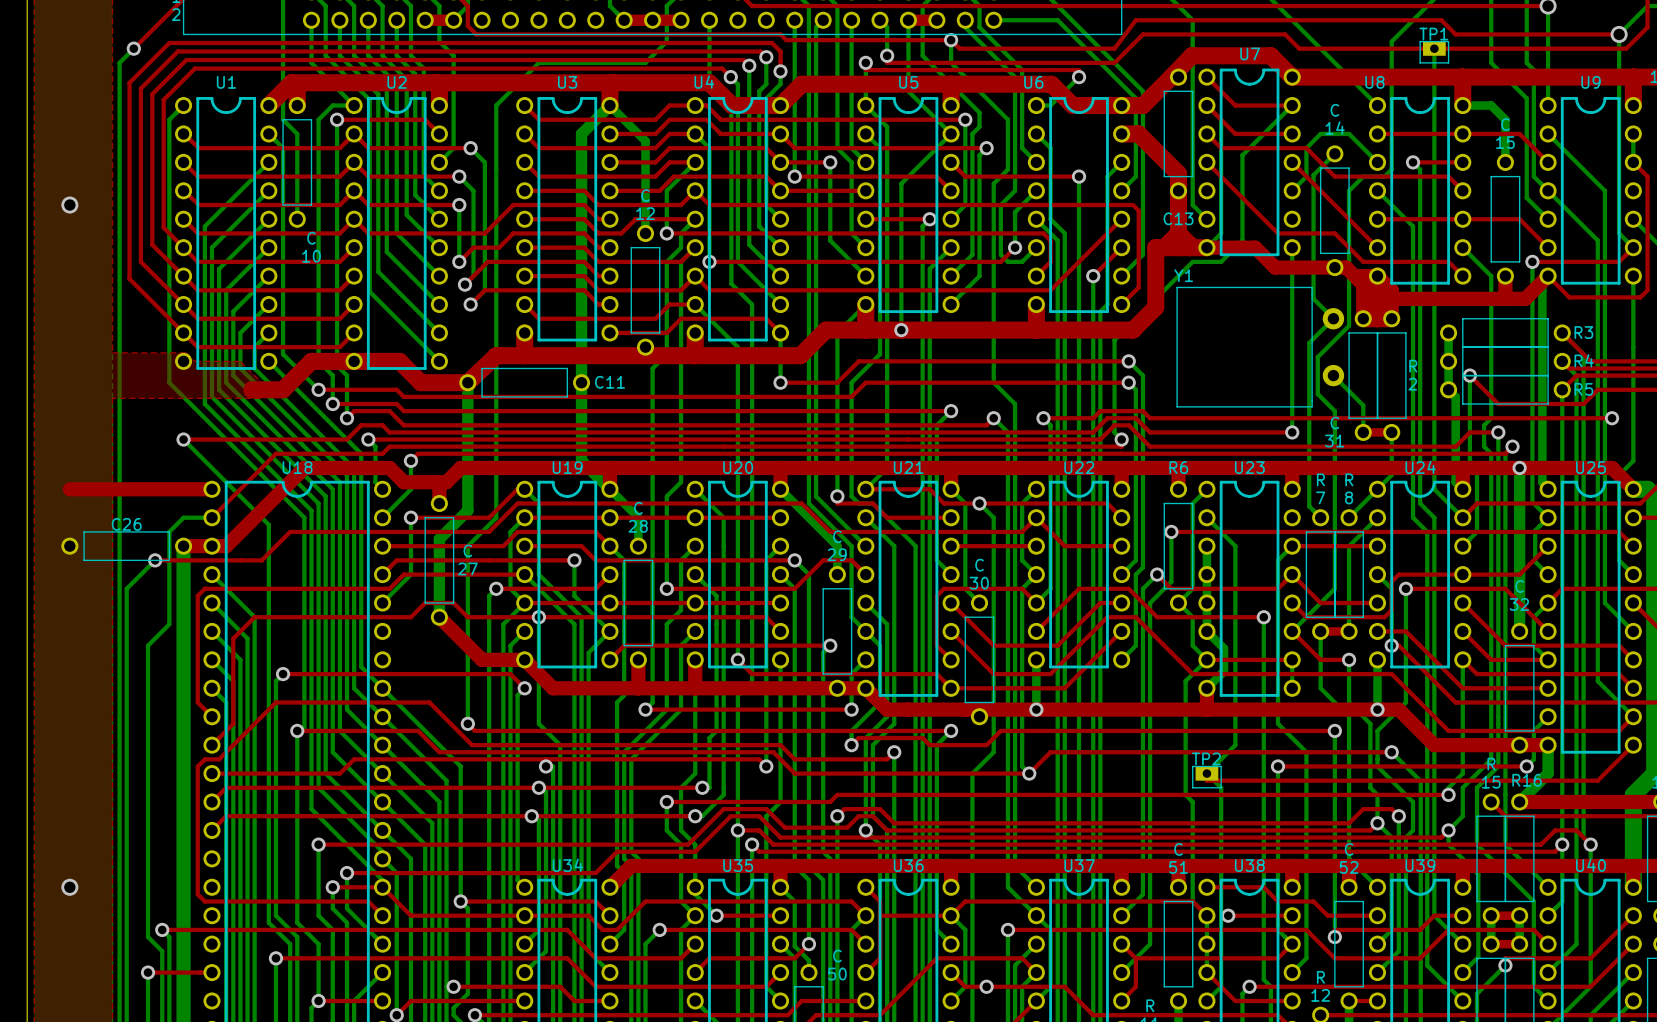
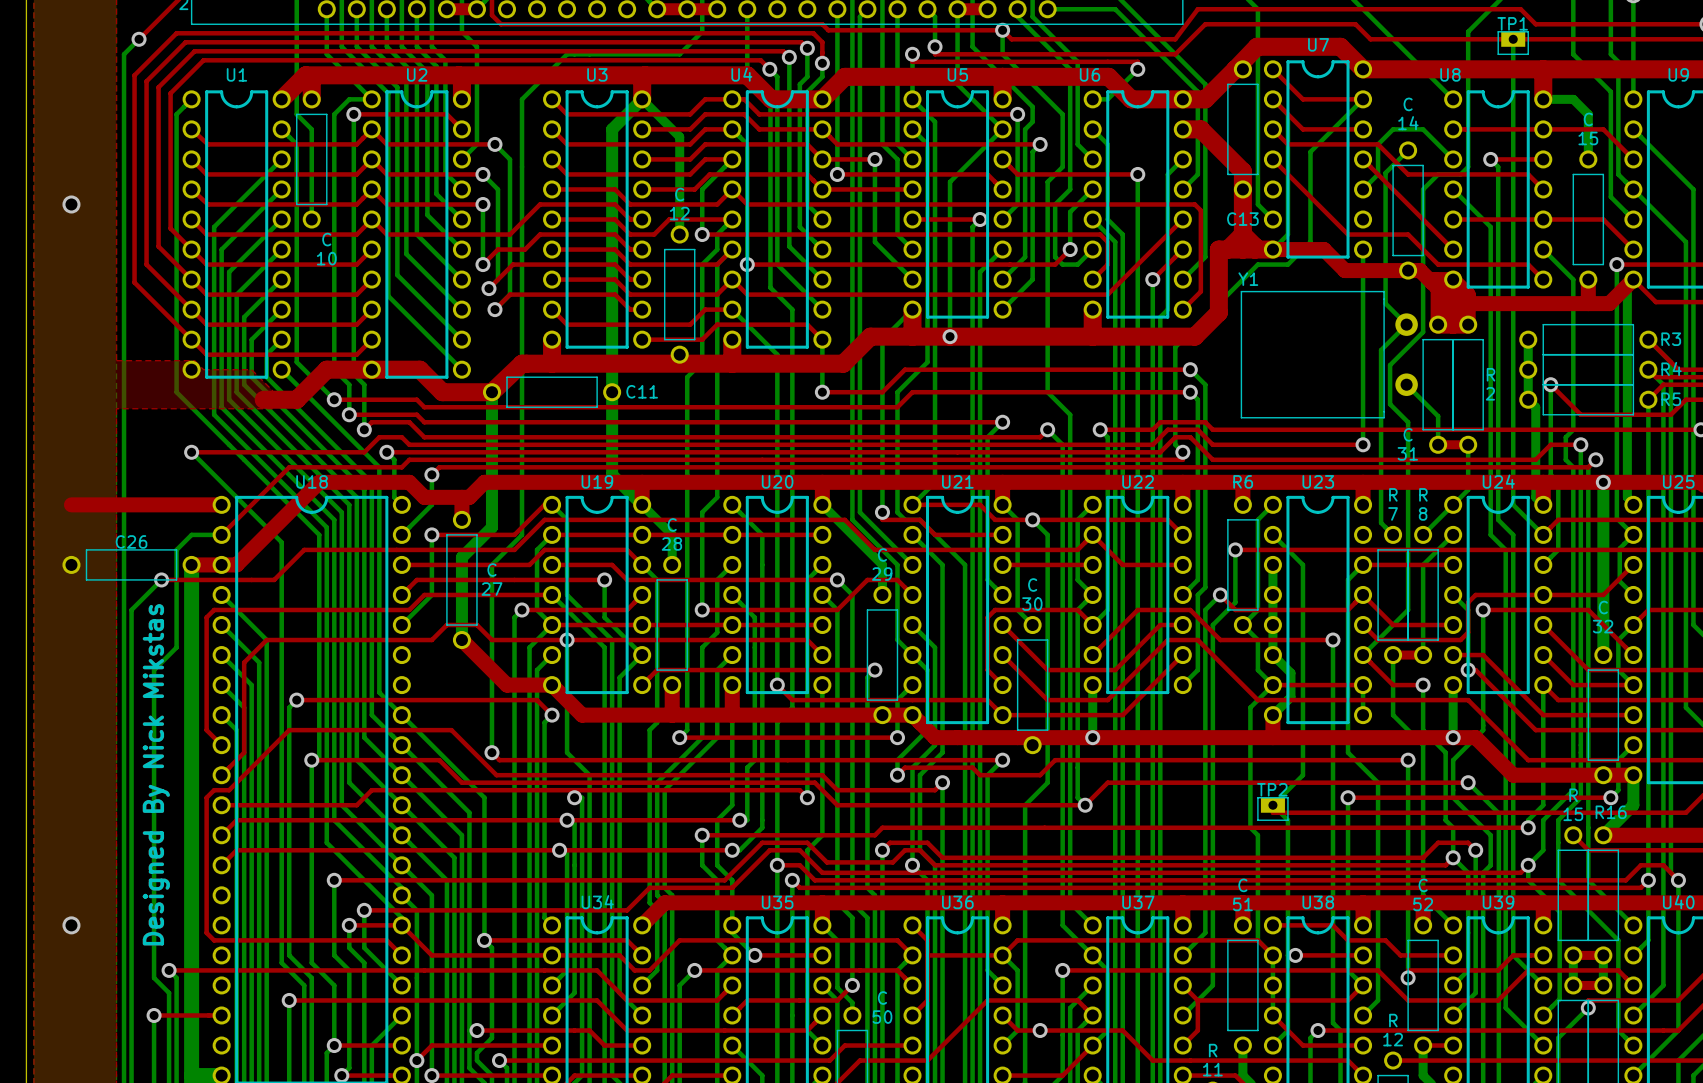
text: none -> Designed By Nick Mikstas (156, 774)

